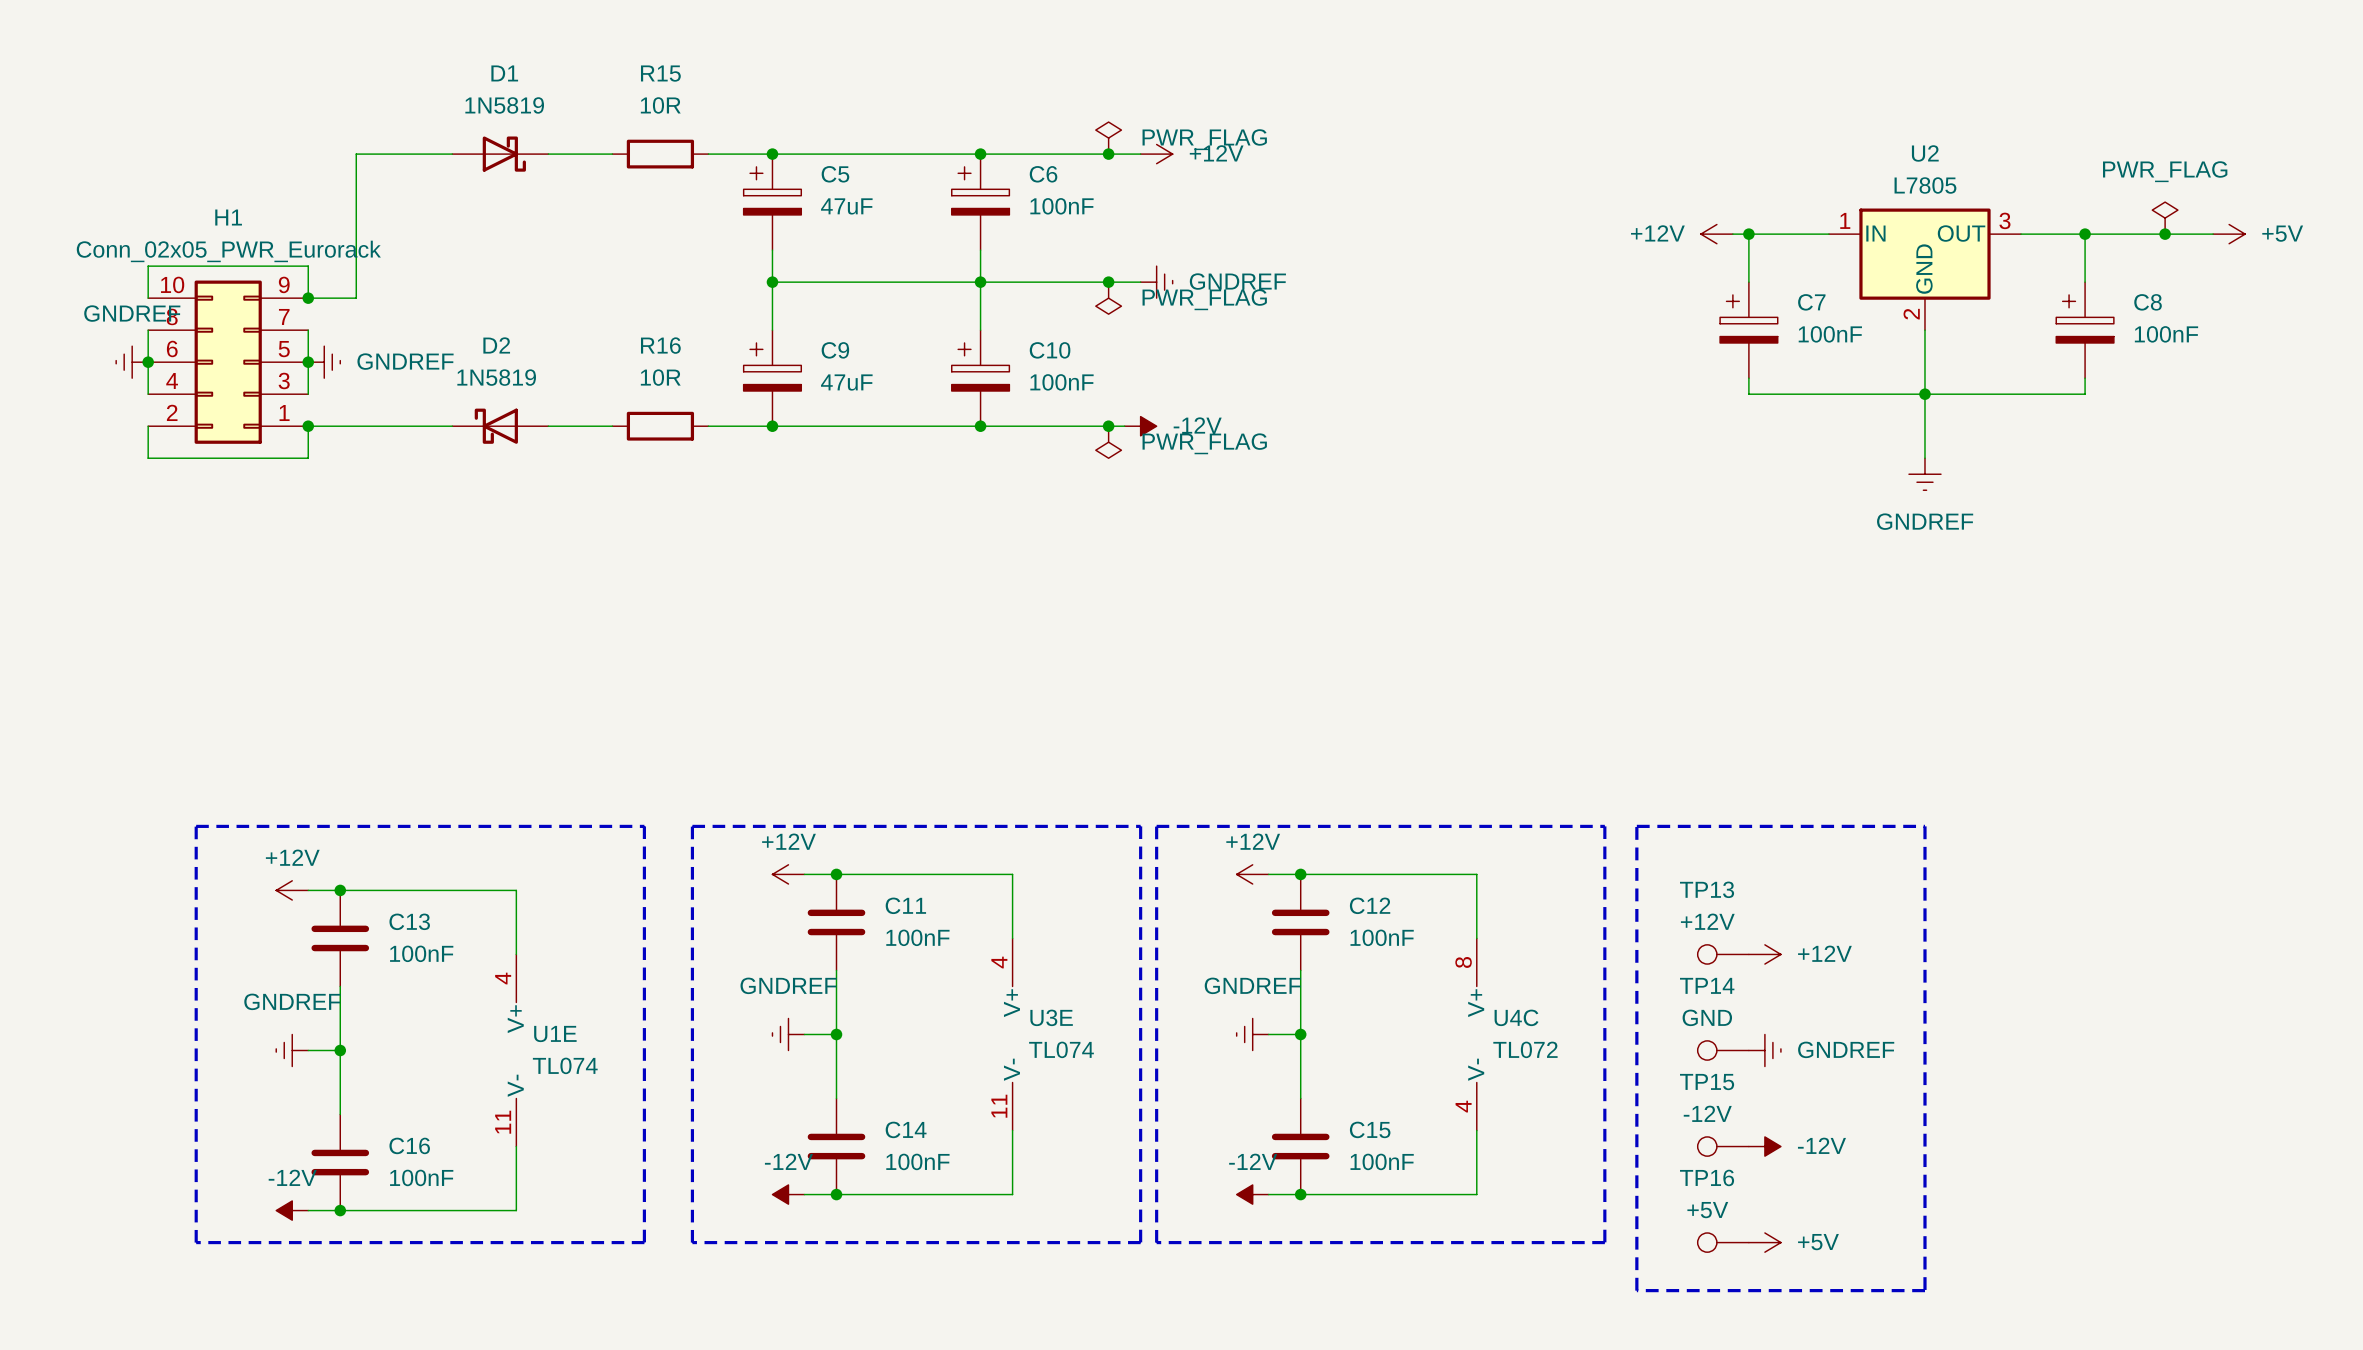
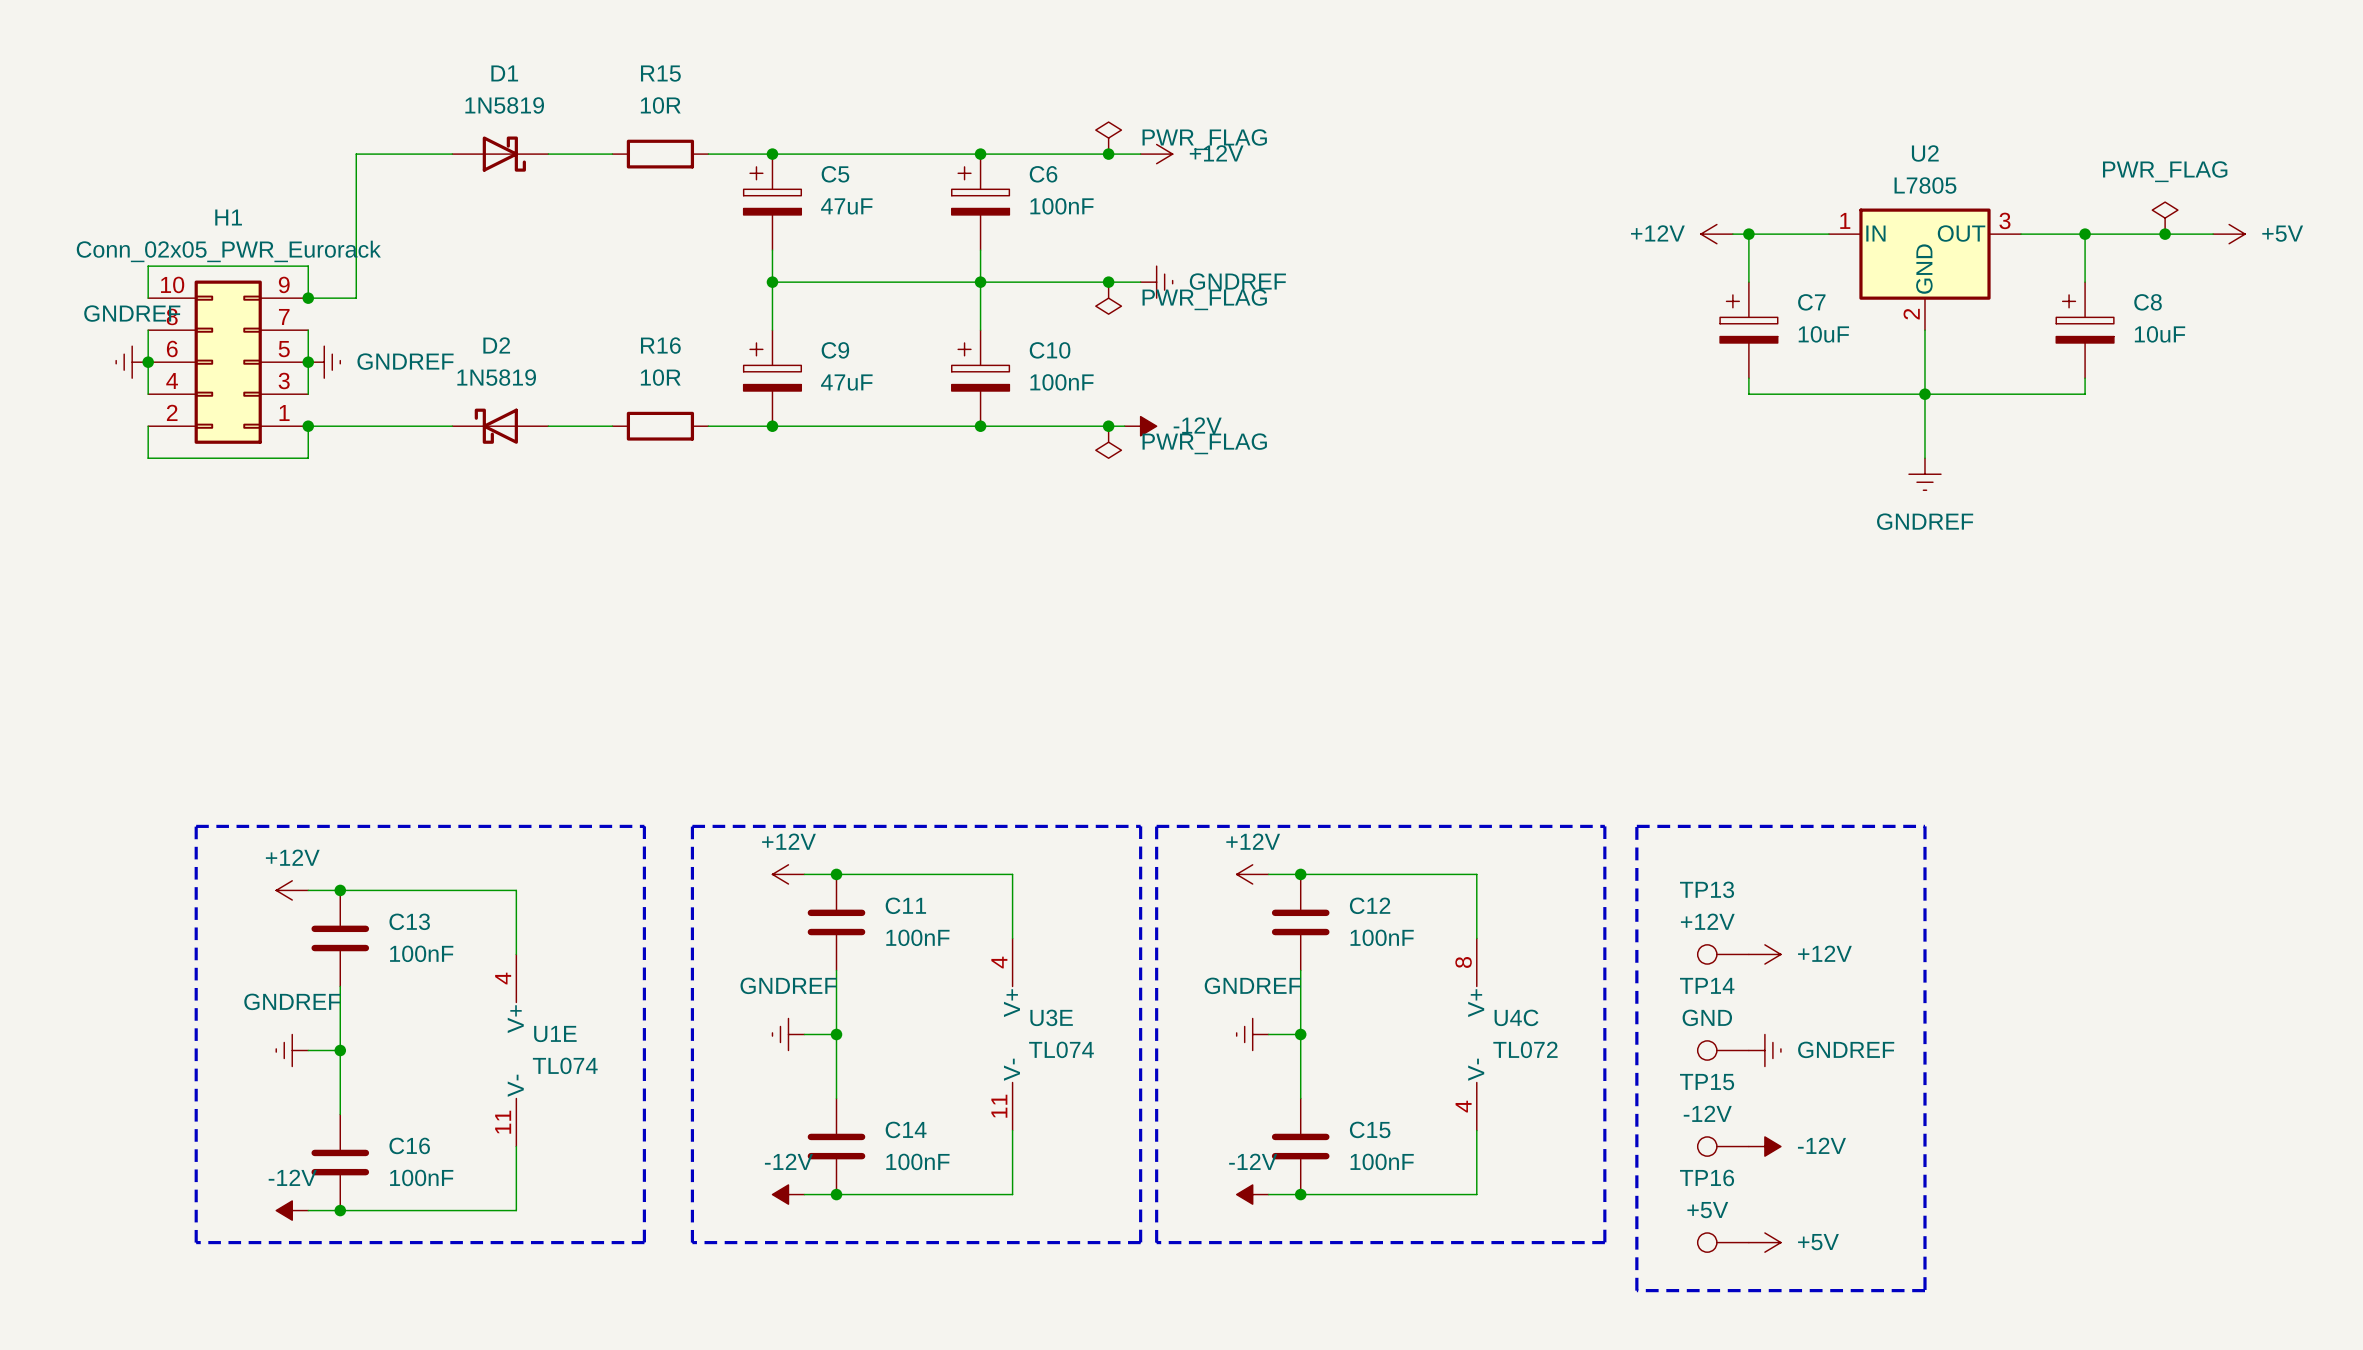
C7 value: 100nF (1830, 334) -> 10uF (1823, 334)
C8 value: 100nF (2166, 334) -> 10uF (2160, 334)

